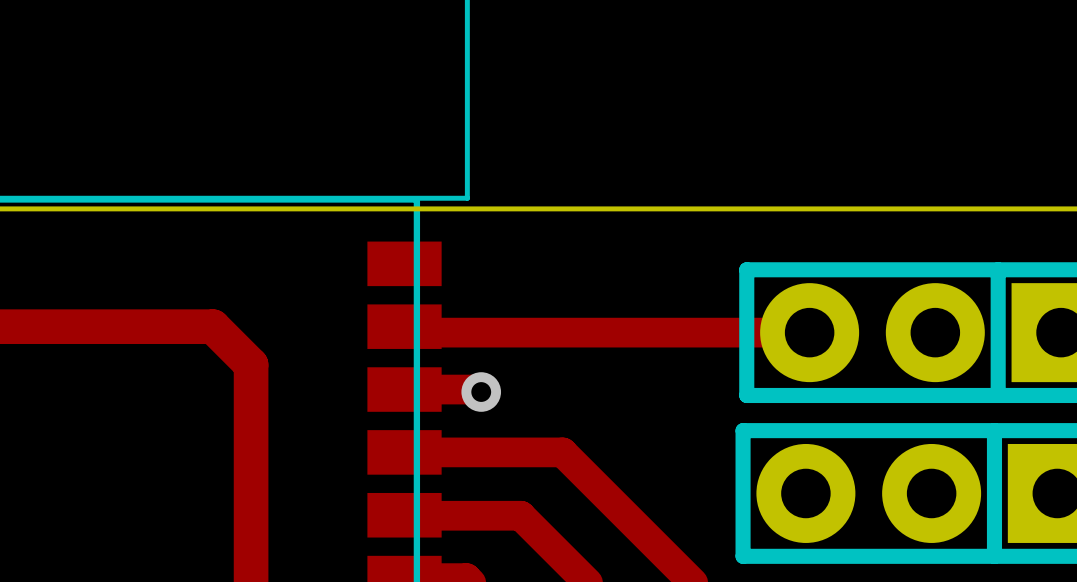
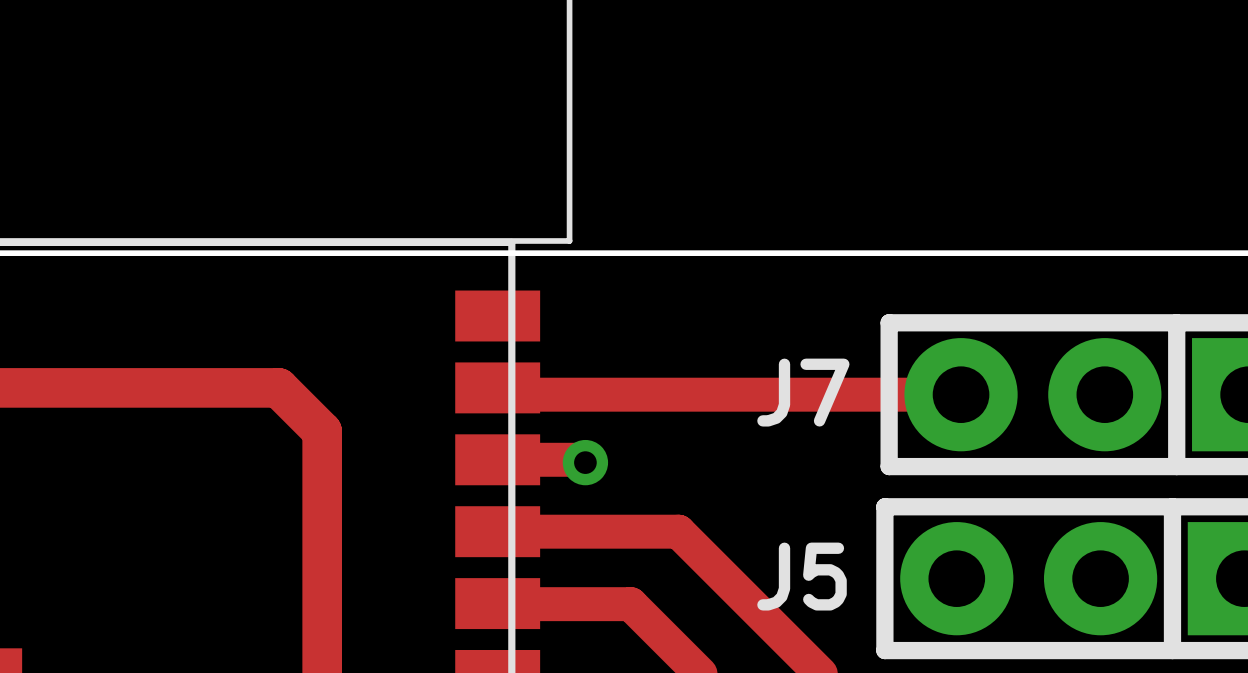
J7 name: none -> J7 (803, 392)
J5 name: none -> J5 (802, 576)

